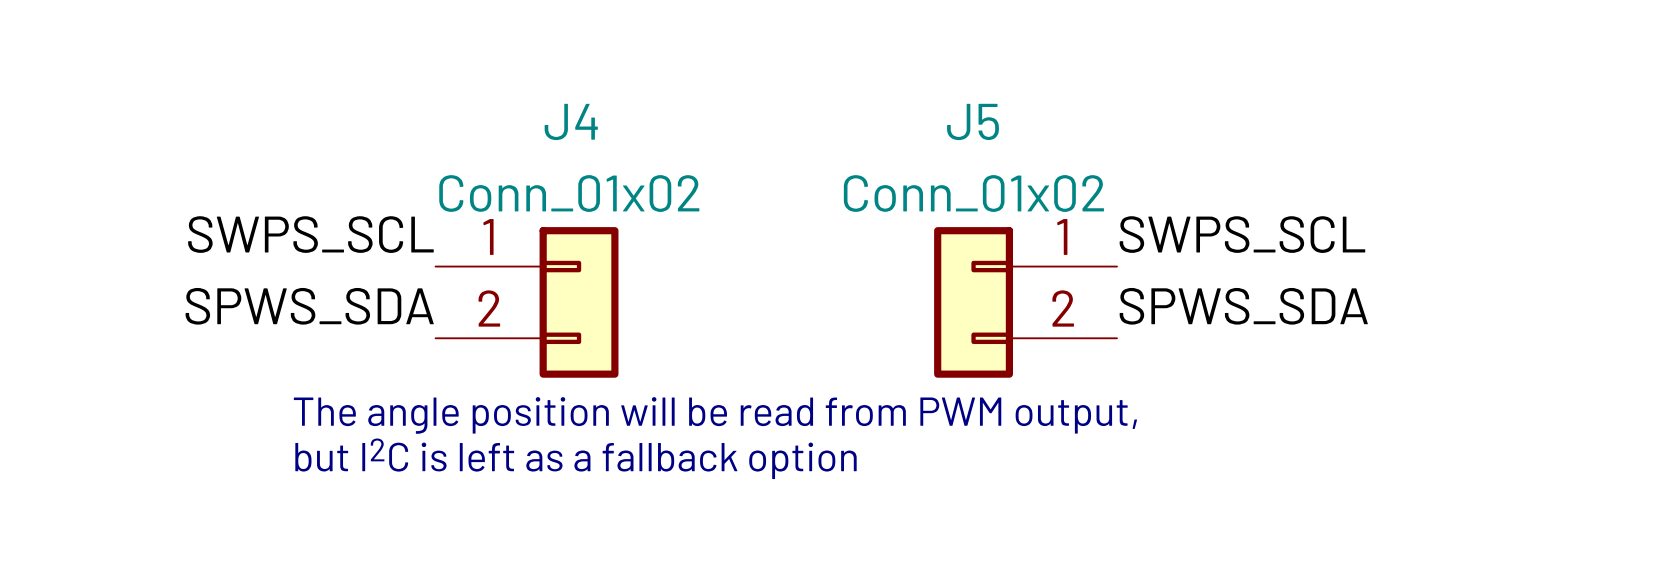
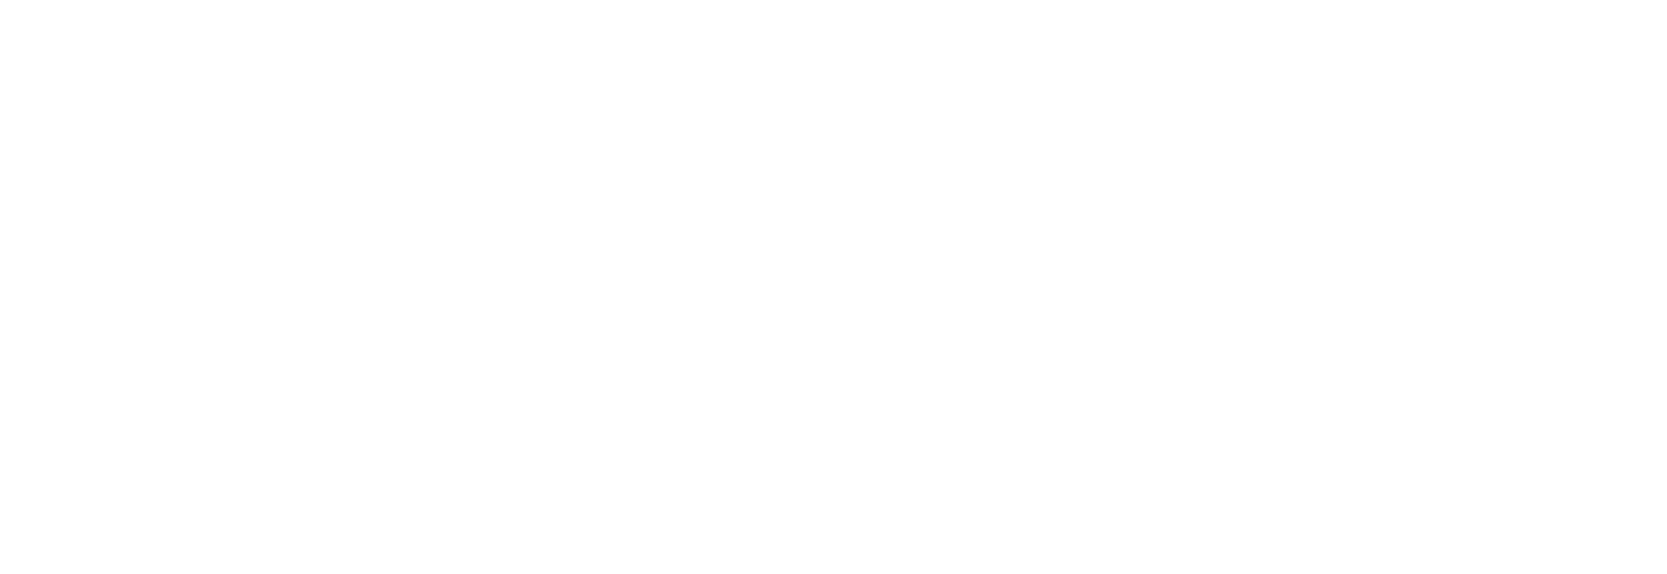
label: SWPS_SCL (310, 234) -> none
label: SWPS_SCL (1242, 234) -> none
J4: Conn_01x02 (527, 302) -> none
J5: Conn_01x02 (1025, 302) -> none
label: SPWS_SDA (309, 306) -> none
label: SPWS_SDA (1243, 306) -> none
text: The angle position will be read from PWM output, (715, 415) -> none
text: but I2C is left as a fallback option (576, 458) -> none

